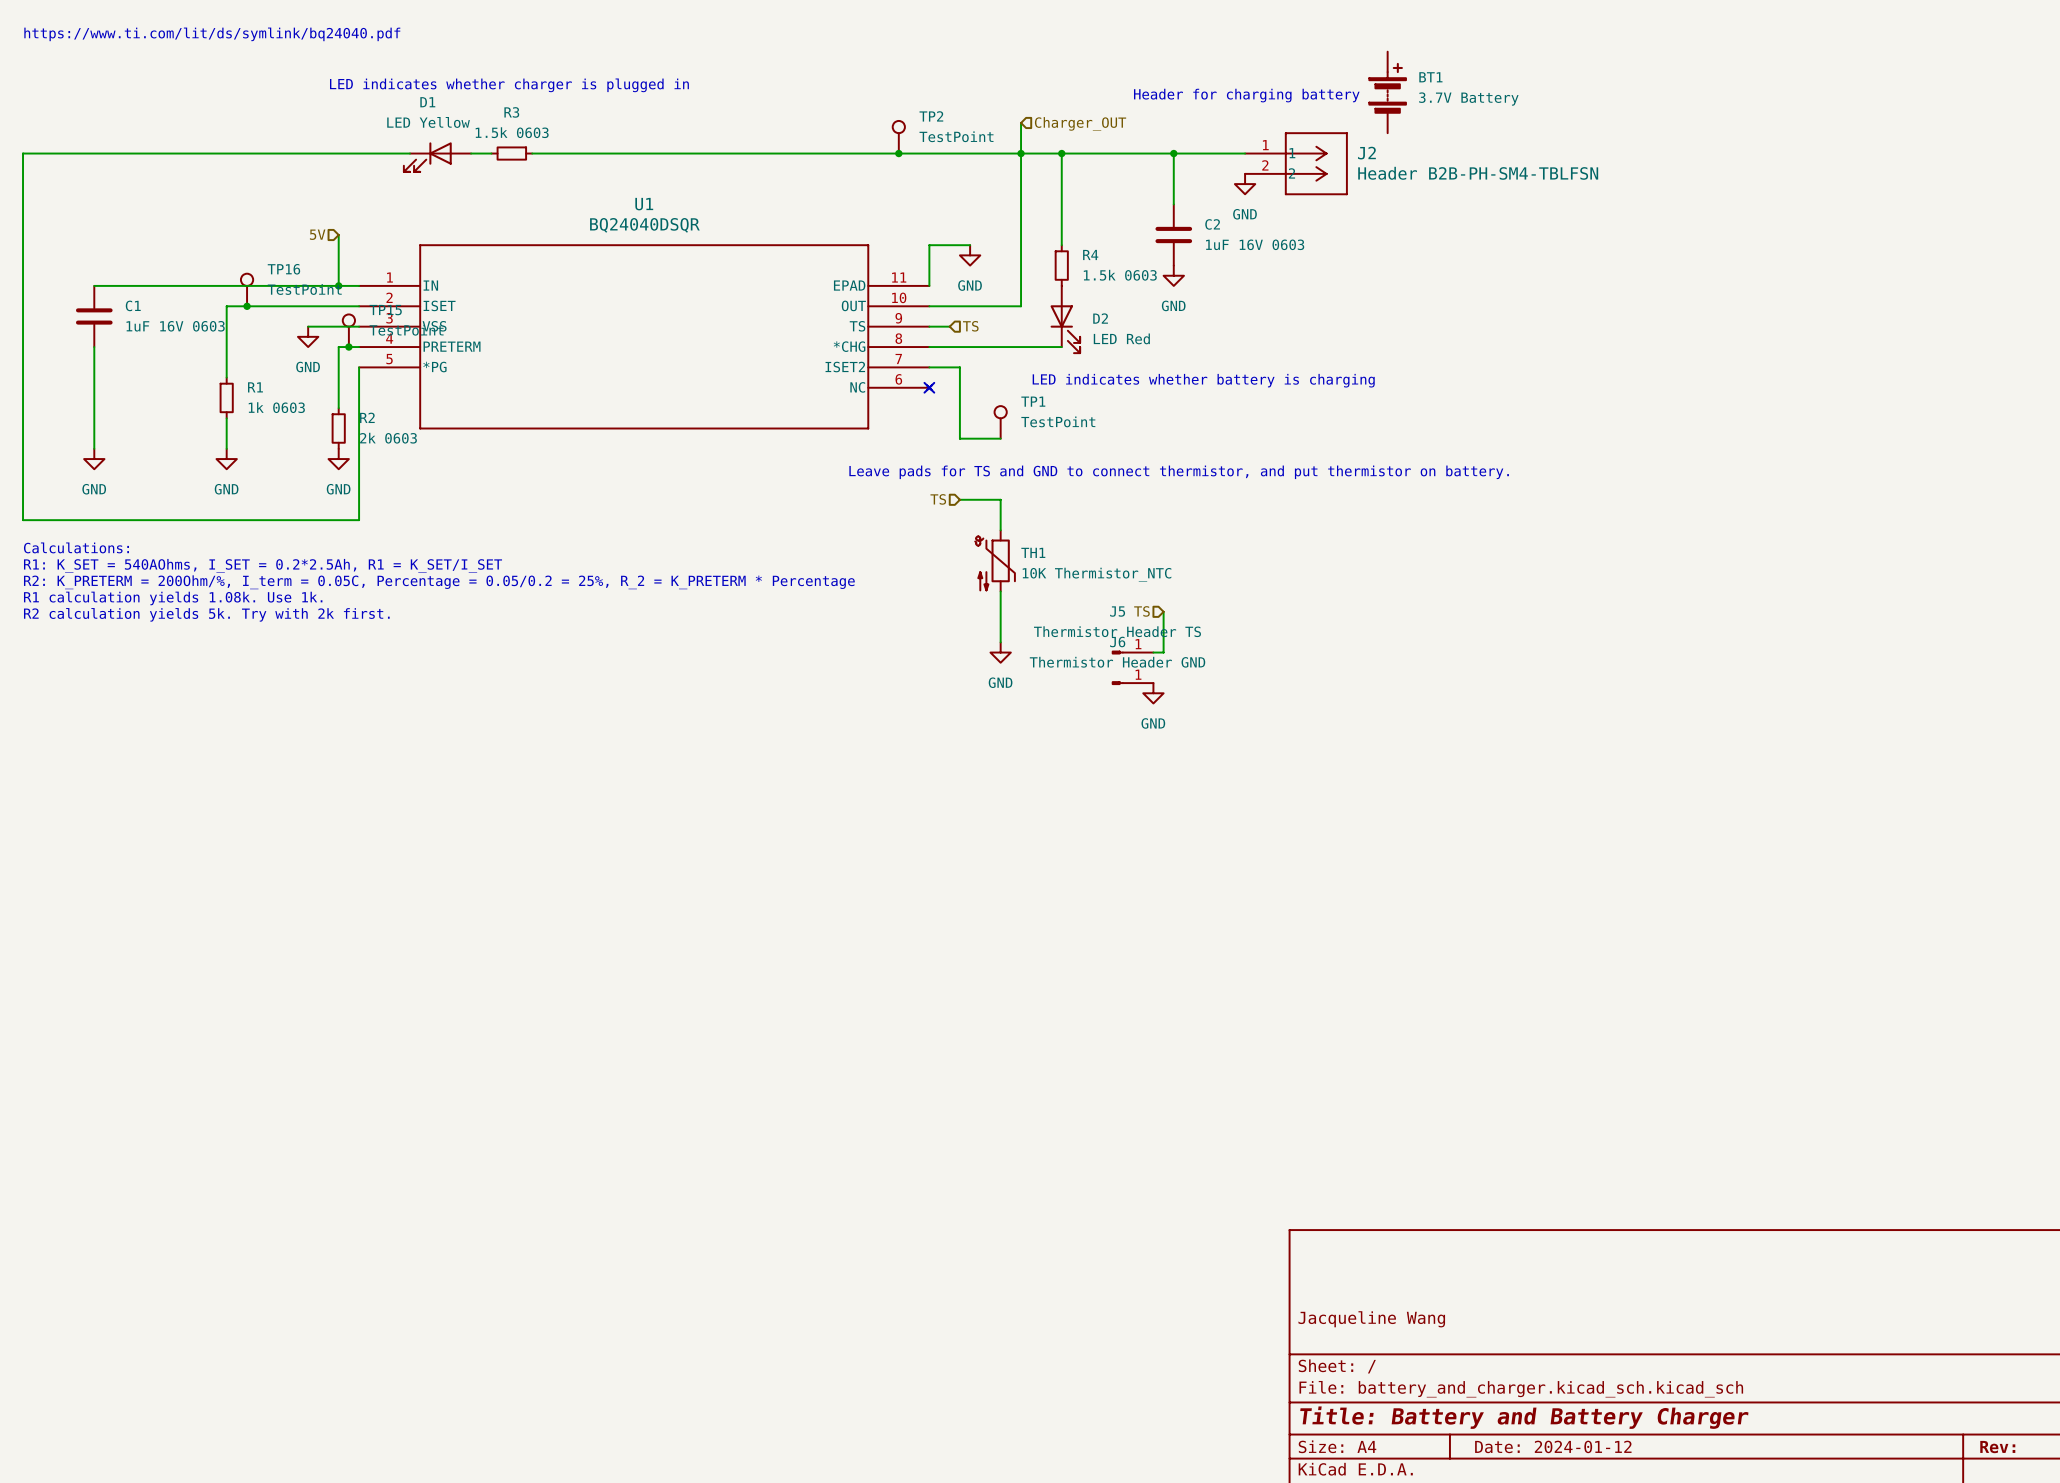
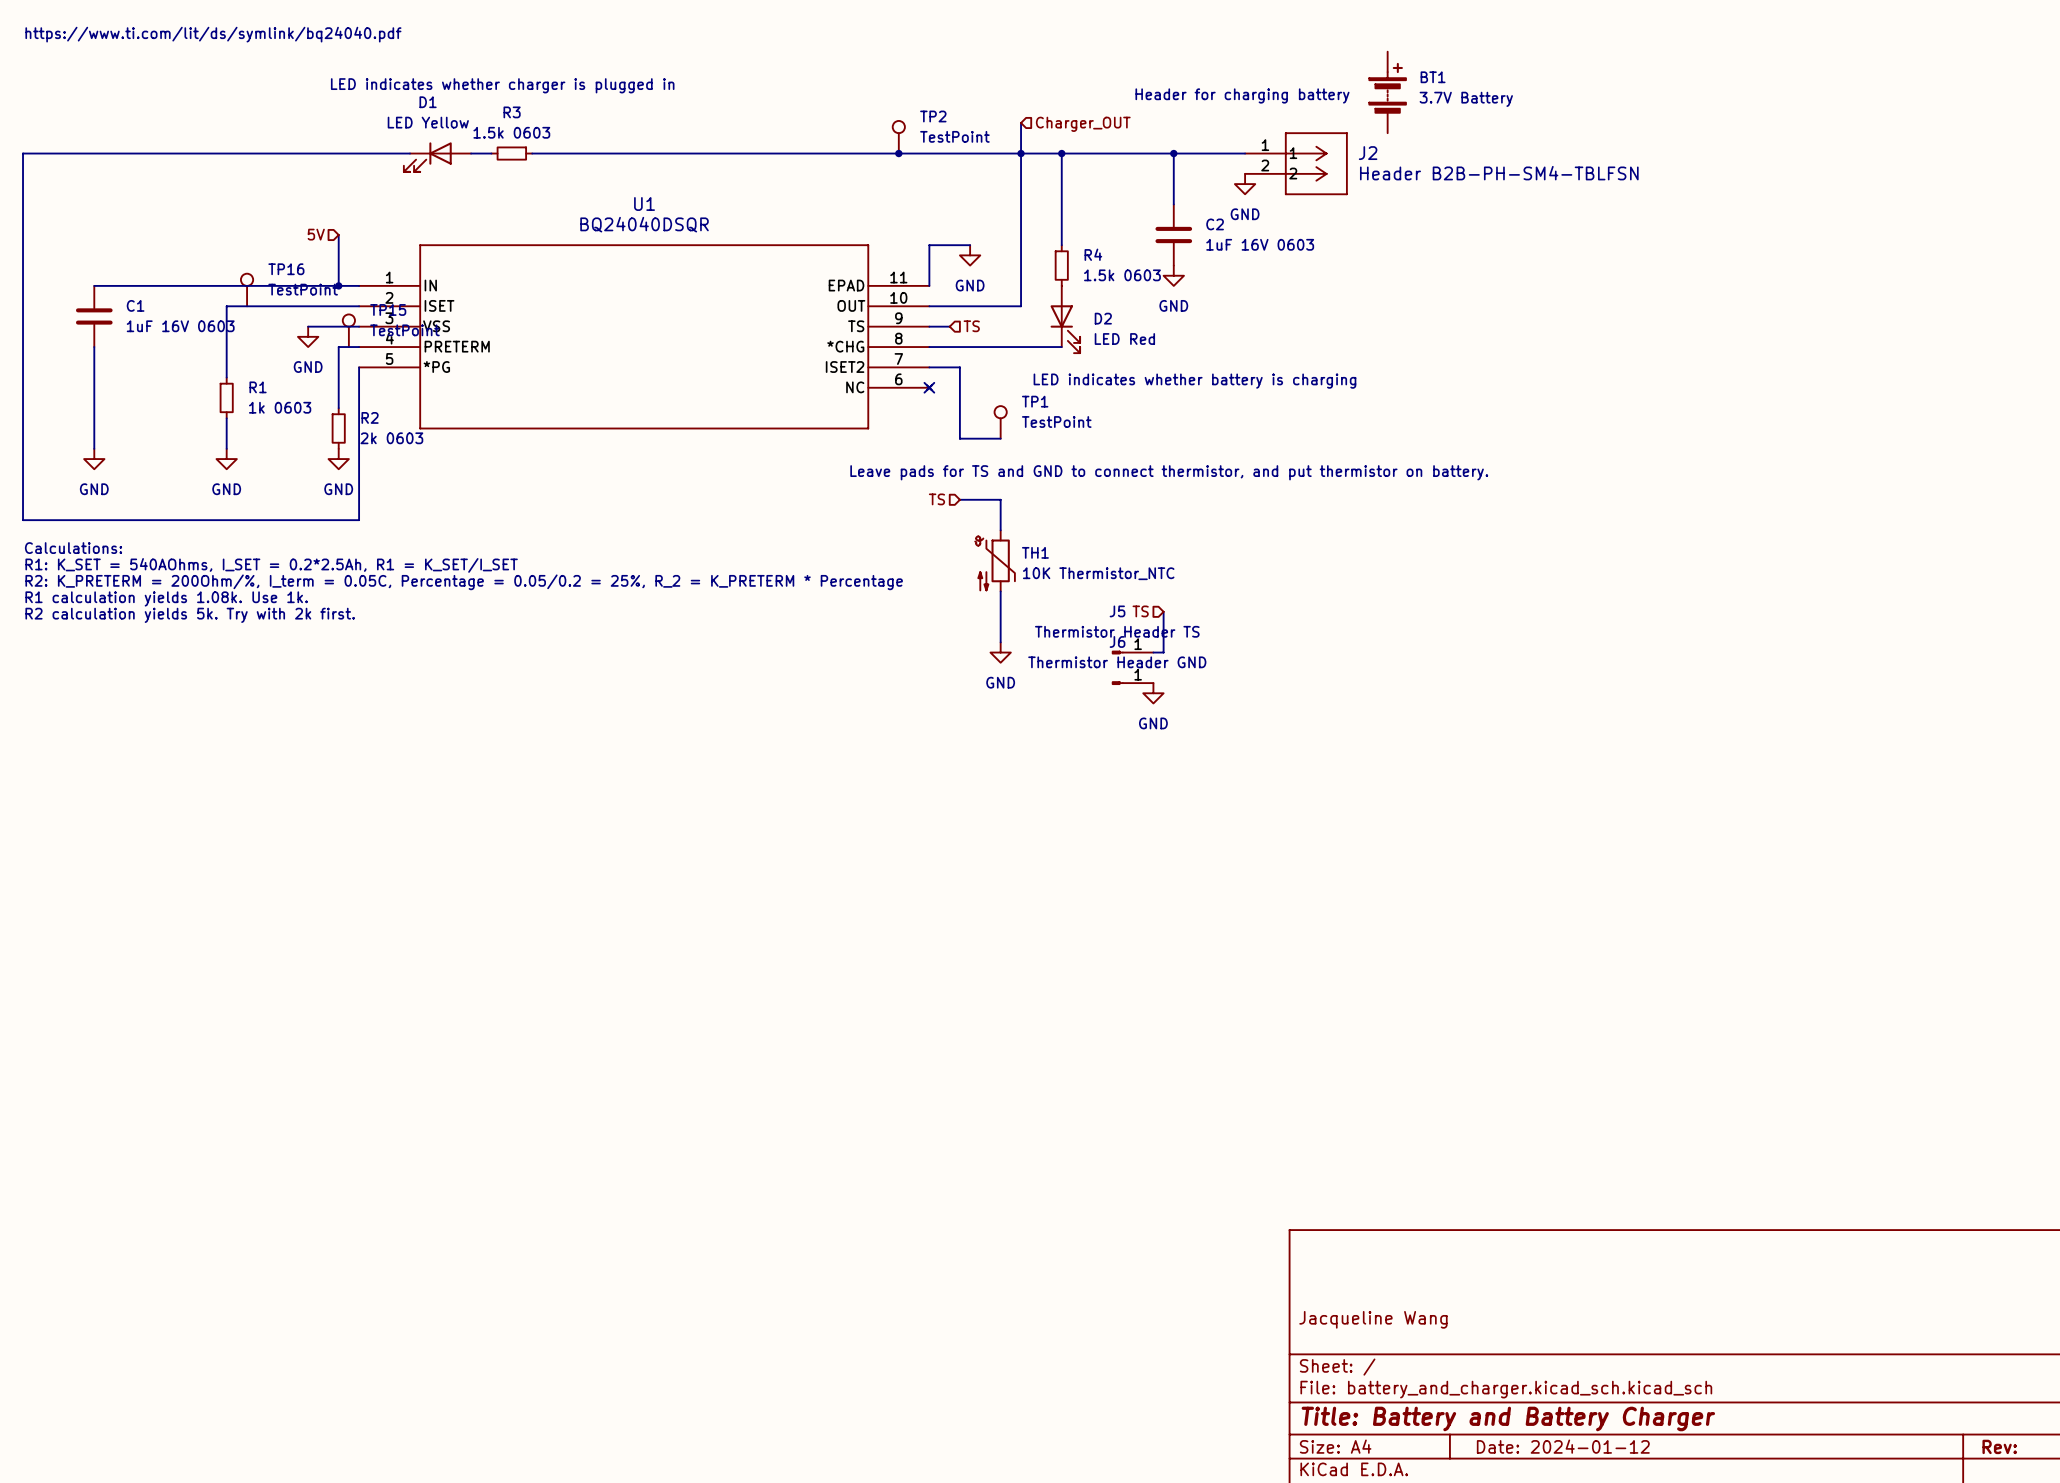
junction: (247, 306) -> none
junction: (348, 347) -> none

